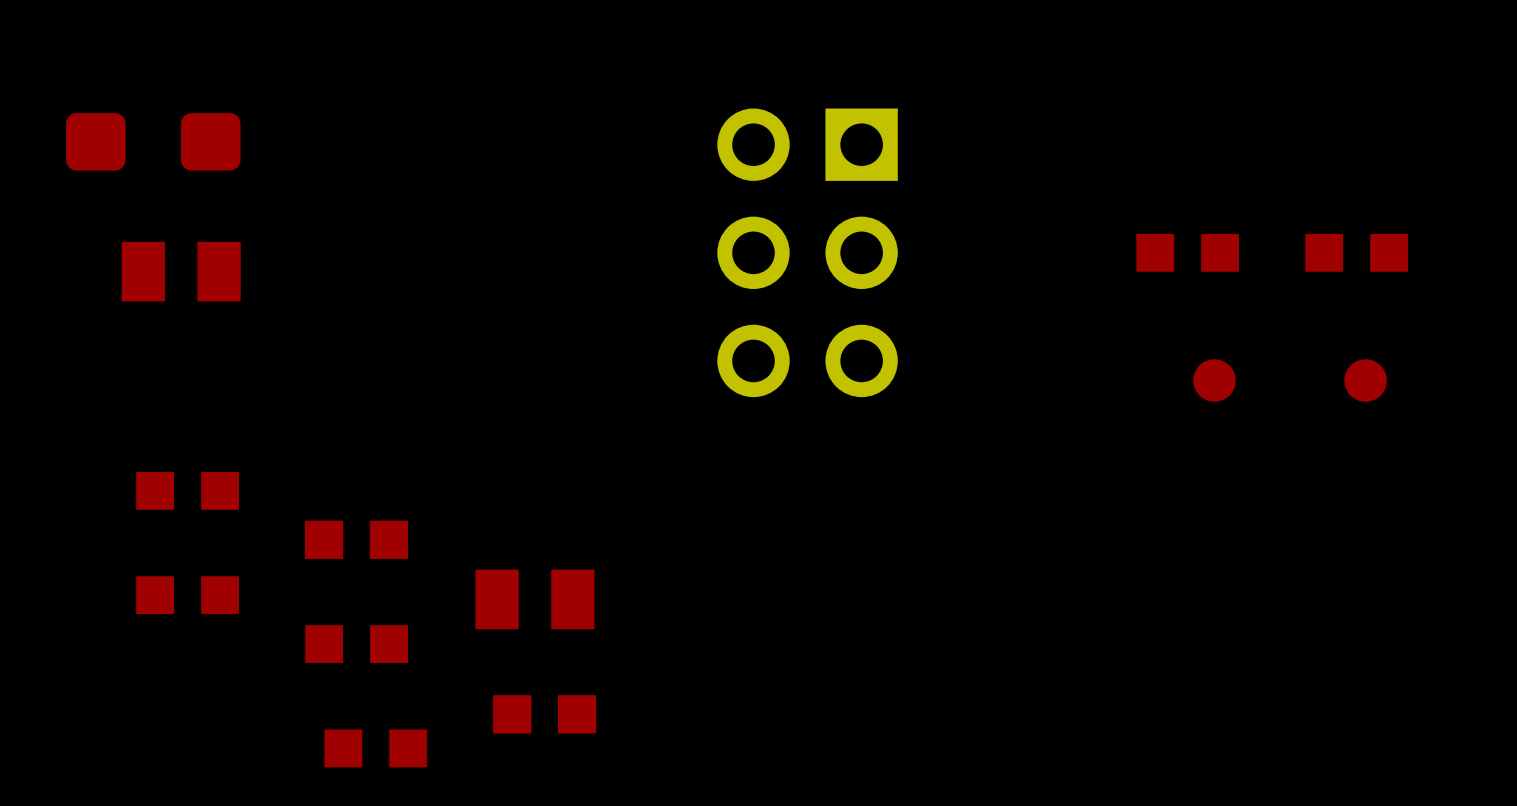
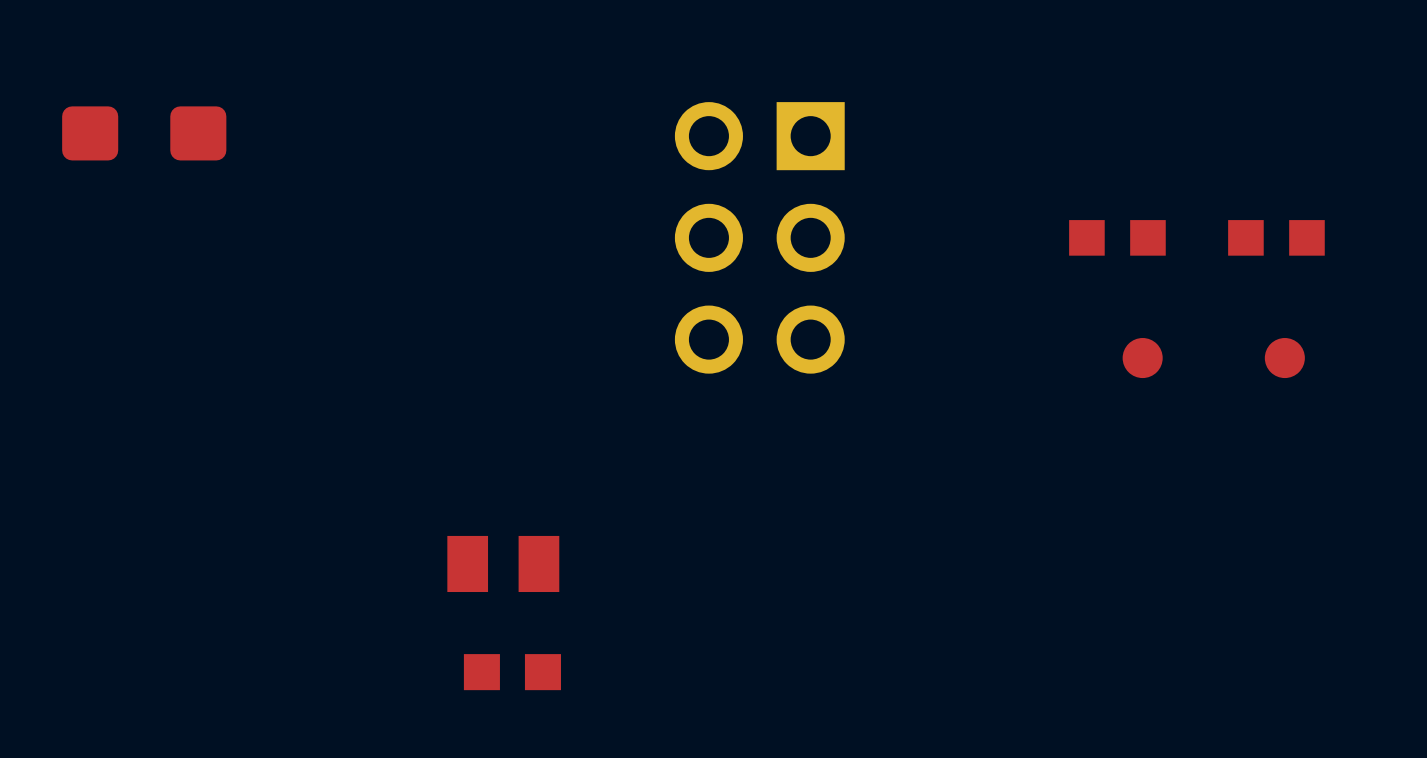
part: (181, 271) -> none
part: (187, 490) -> none
part: (356, 539) -> none
part: (187, 595) -> none
part: (356, 644) -> none
part: (375, 748) -> none

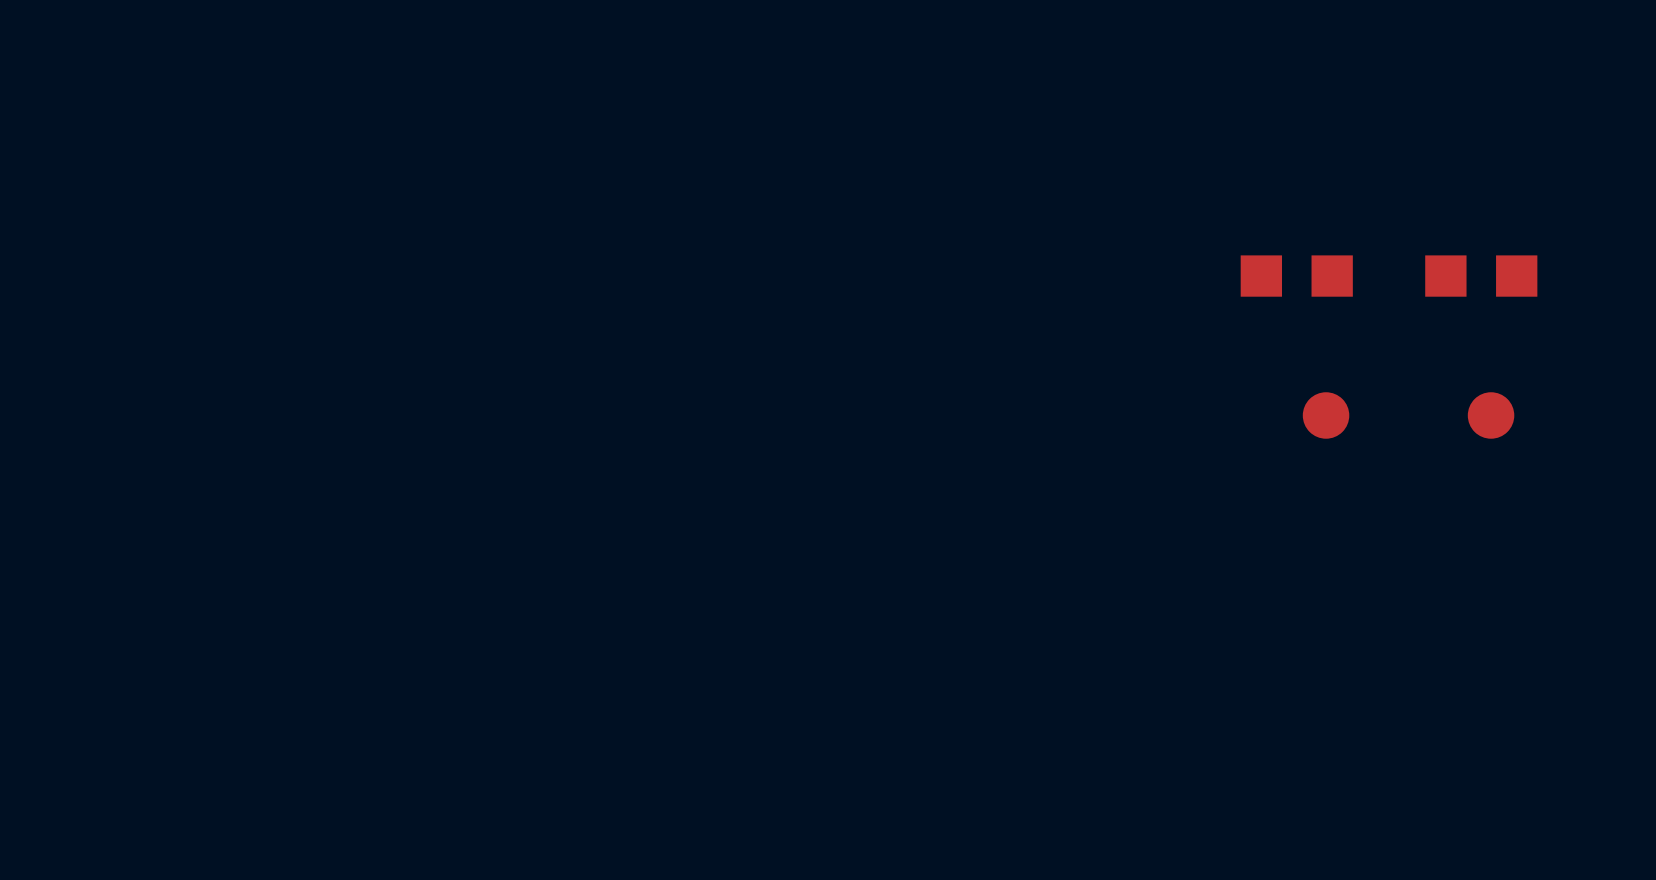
part: (144, 133) -> none
part: (759, 237) -> none
part: (503, 563) -> none
part: (512, 672) -> none

